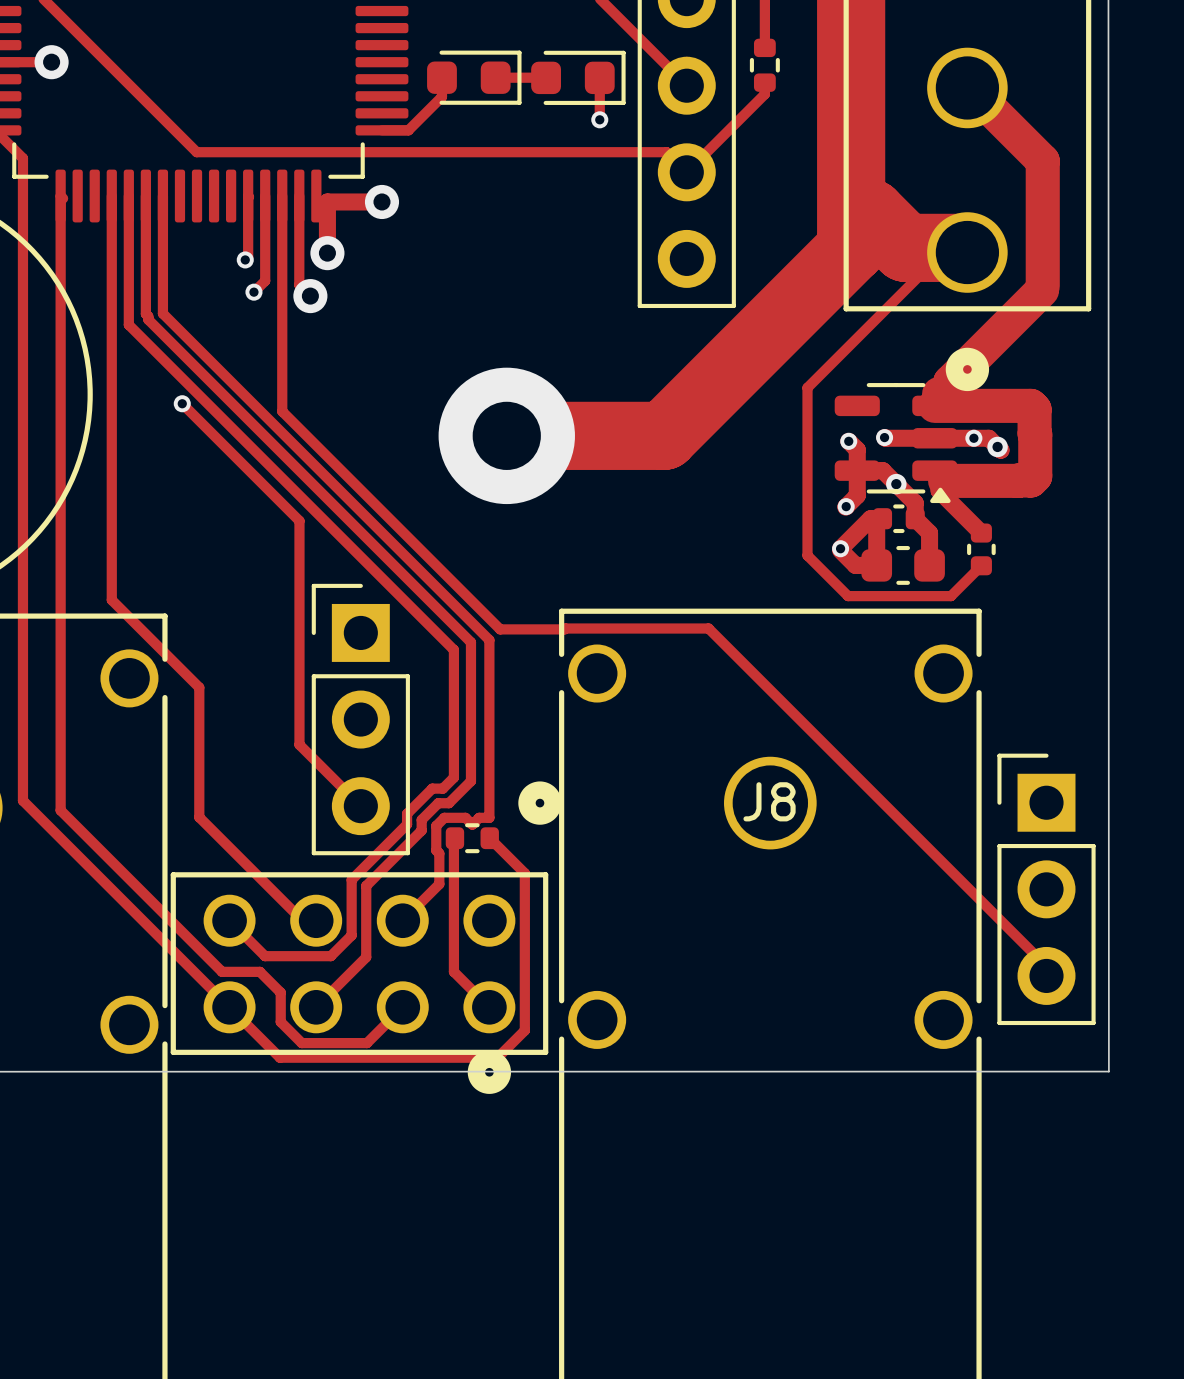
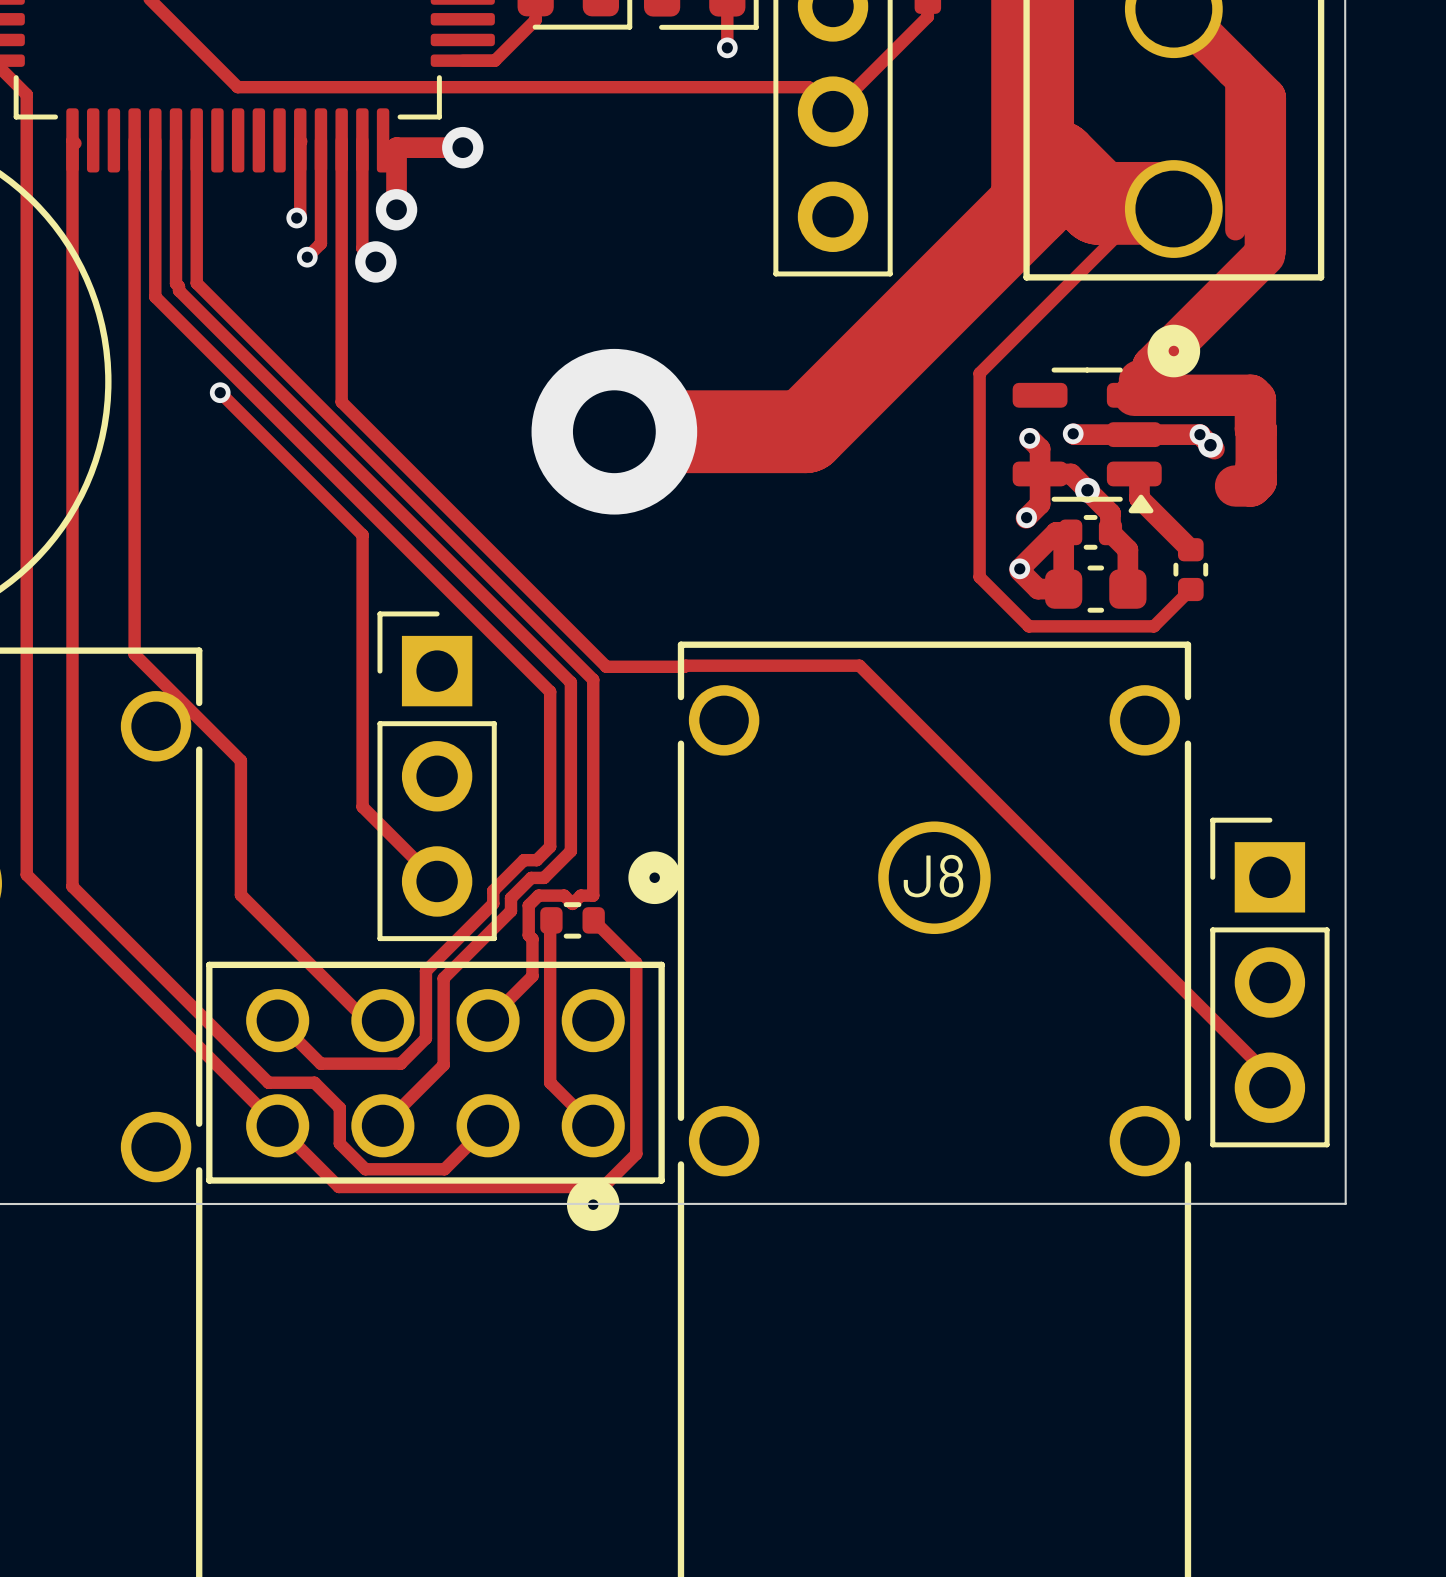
track: none -> (1235, 68) (1235, 230)
via position: (973, 438) -> (1199, 434)
track: (939, 474) (945, 480) (1017, 480) -> none
track: (111, 600) (199, 687) (199, 706) -> (134, 631) (134, 654) (240, 760)

